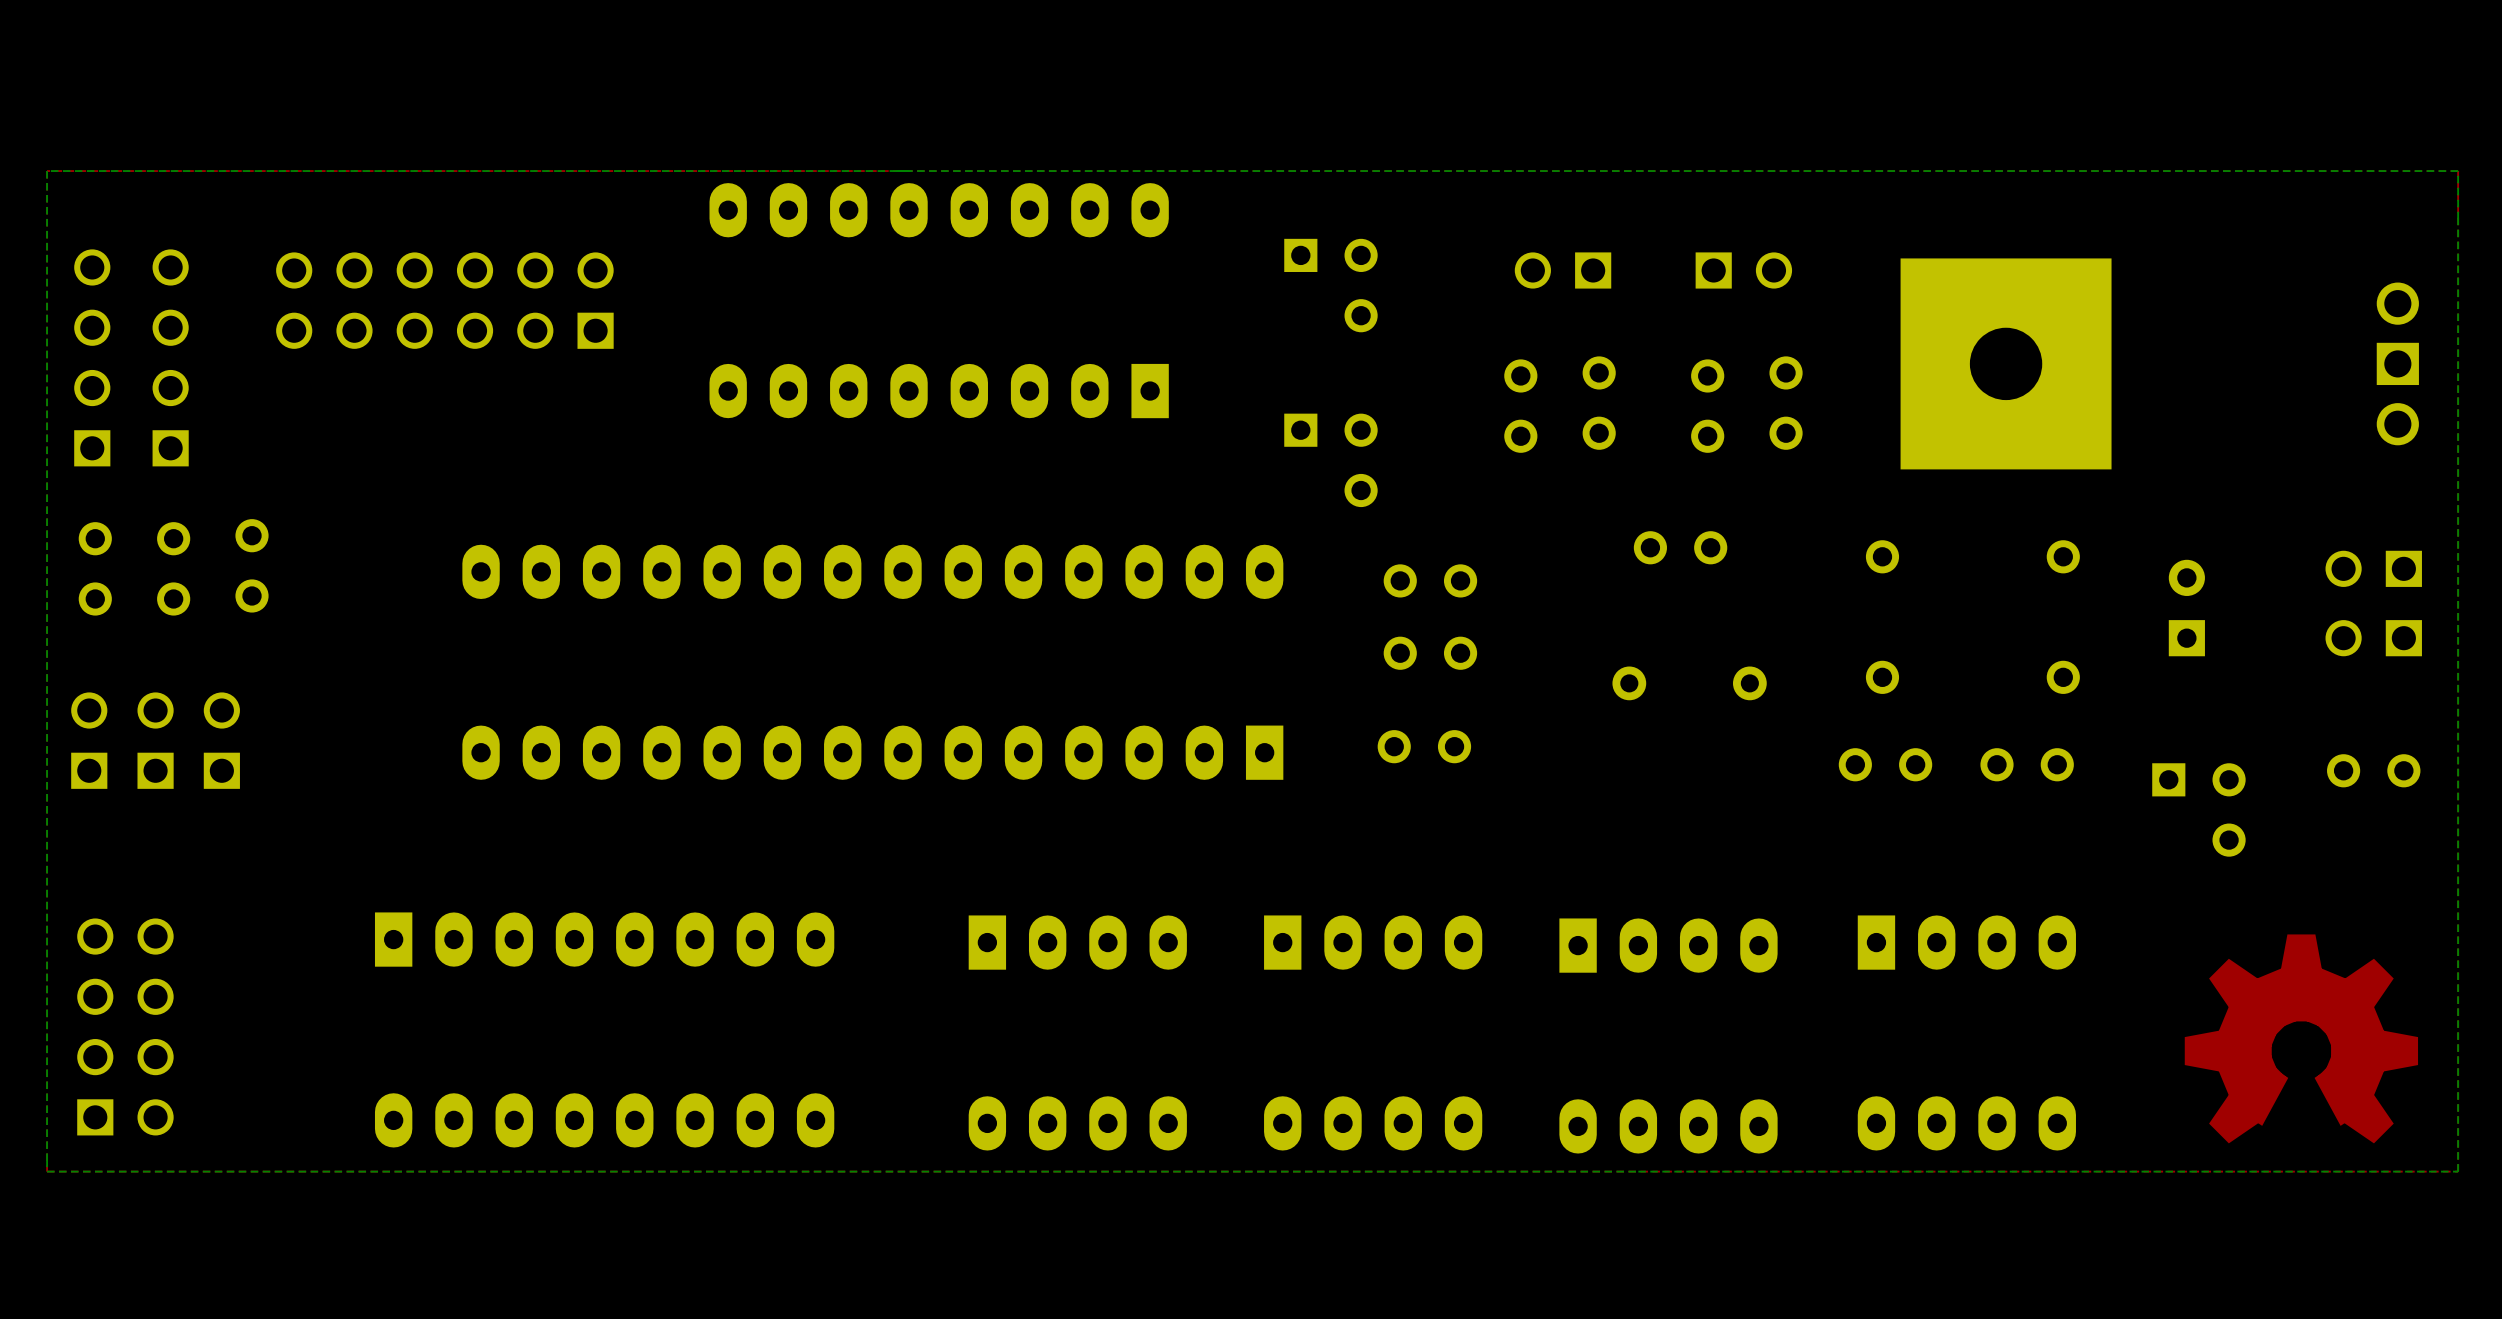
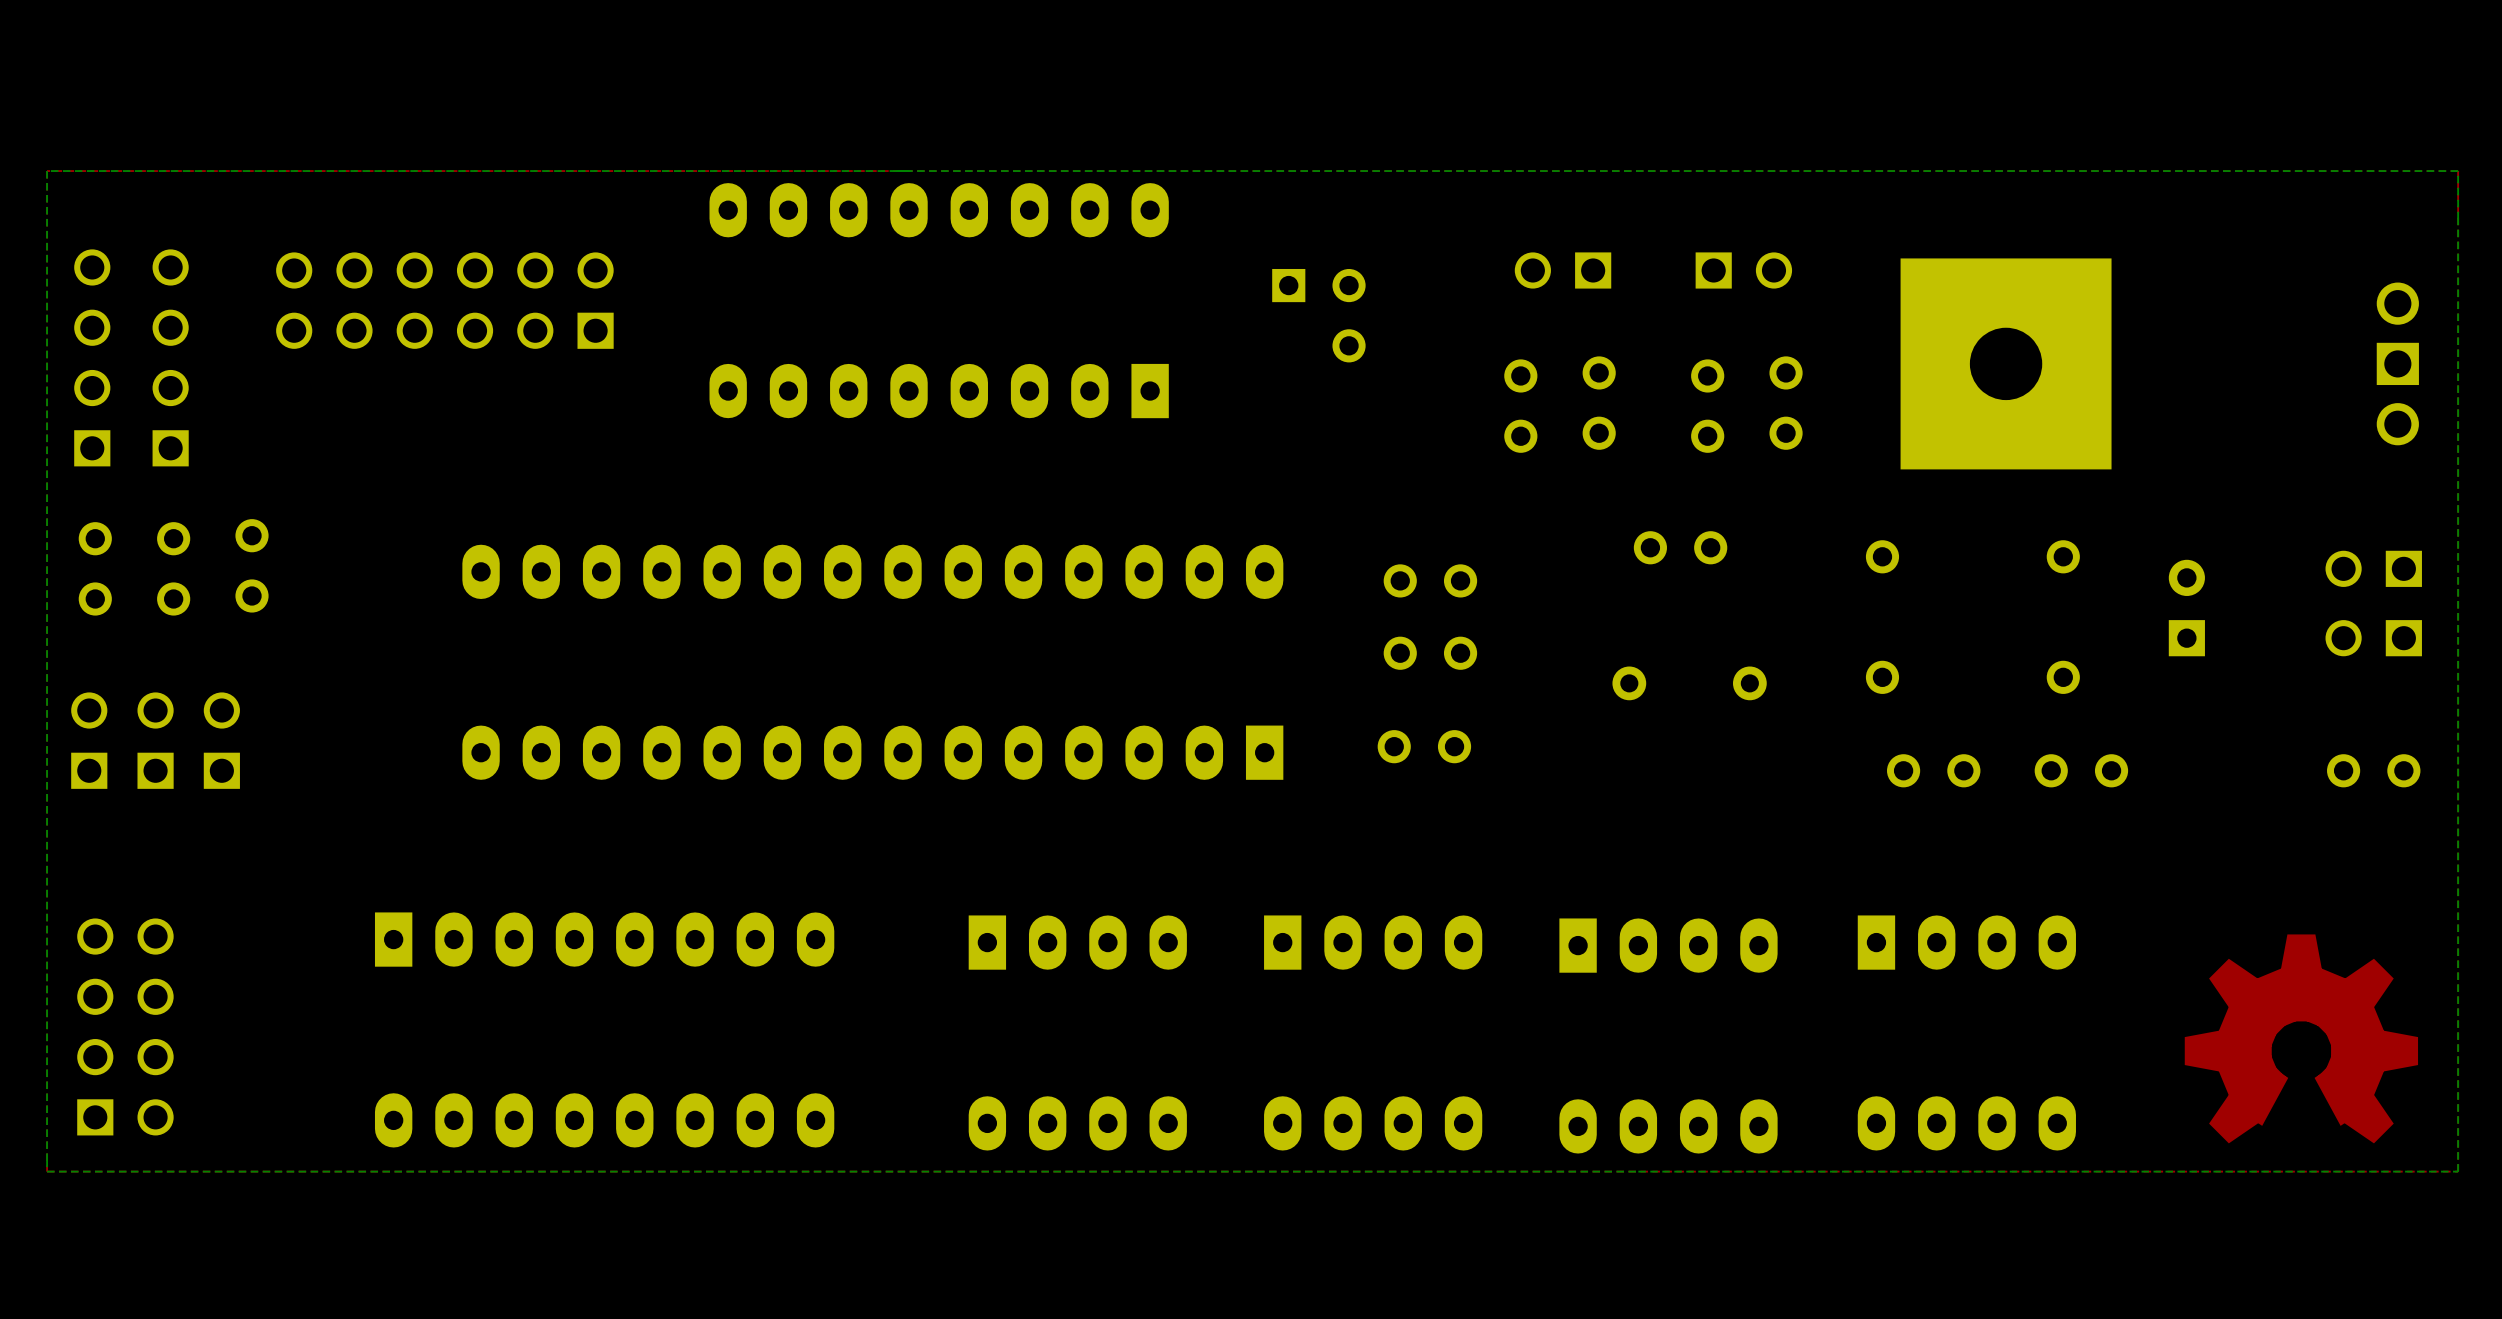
part position: (1330, 285) -> (1318, 315)
part: (1330, 460) -> none
part: (1885, 764) -> none
part: (2027, 764) -> none
part: none -> (1933, 770)
part: none -> (2081, 770)
part: (2198, 809) -> none

